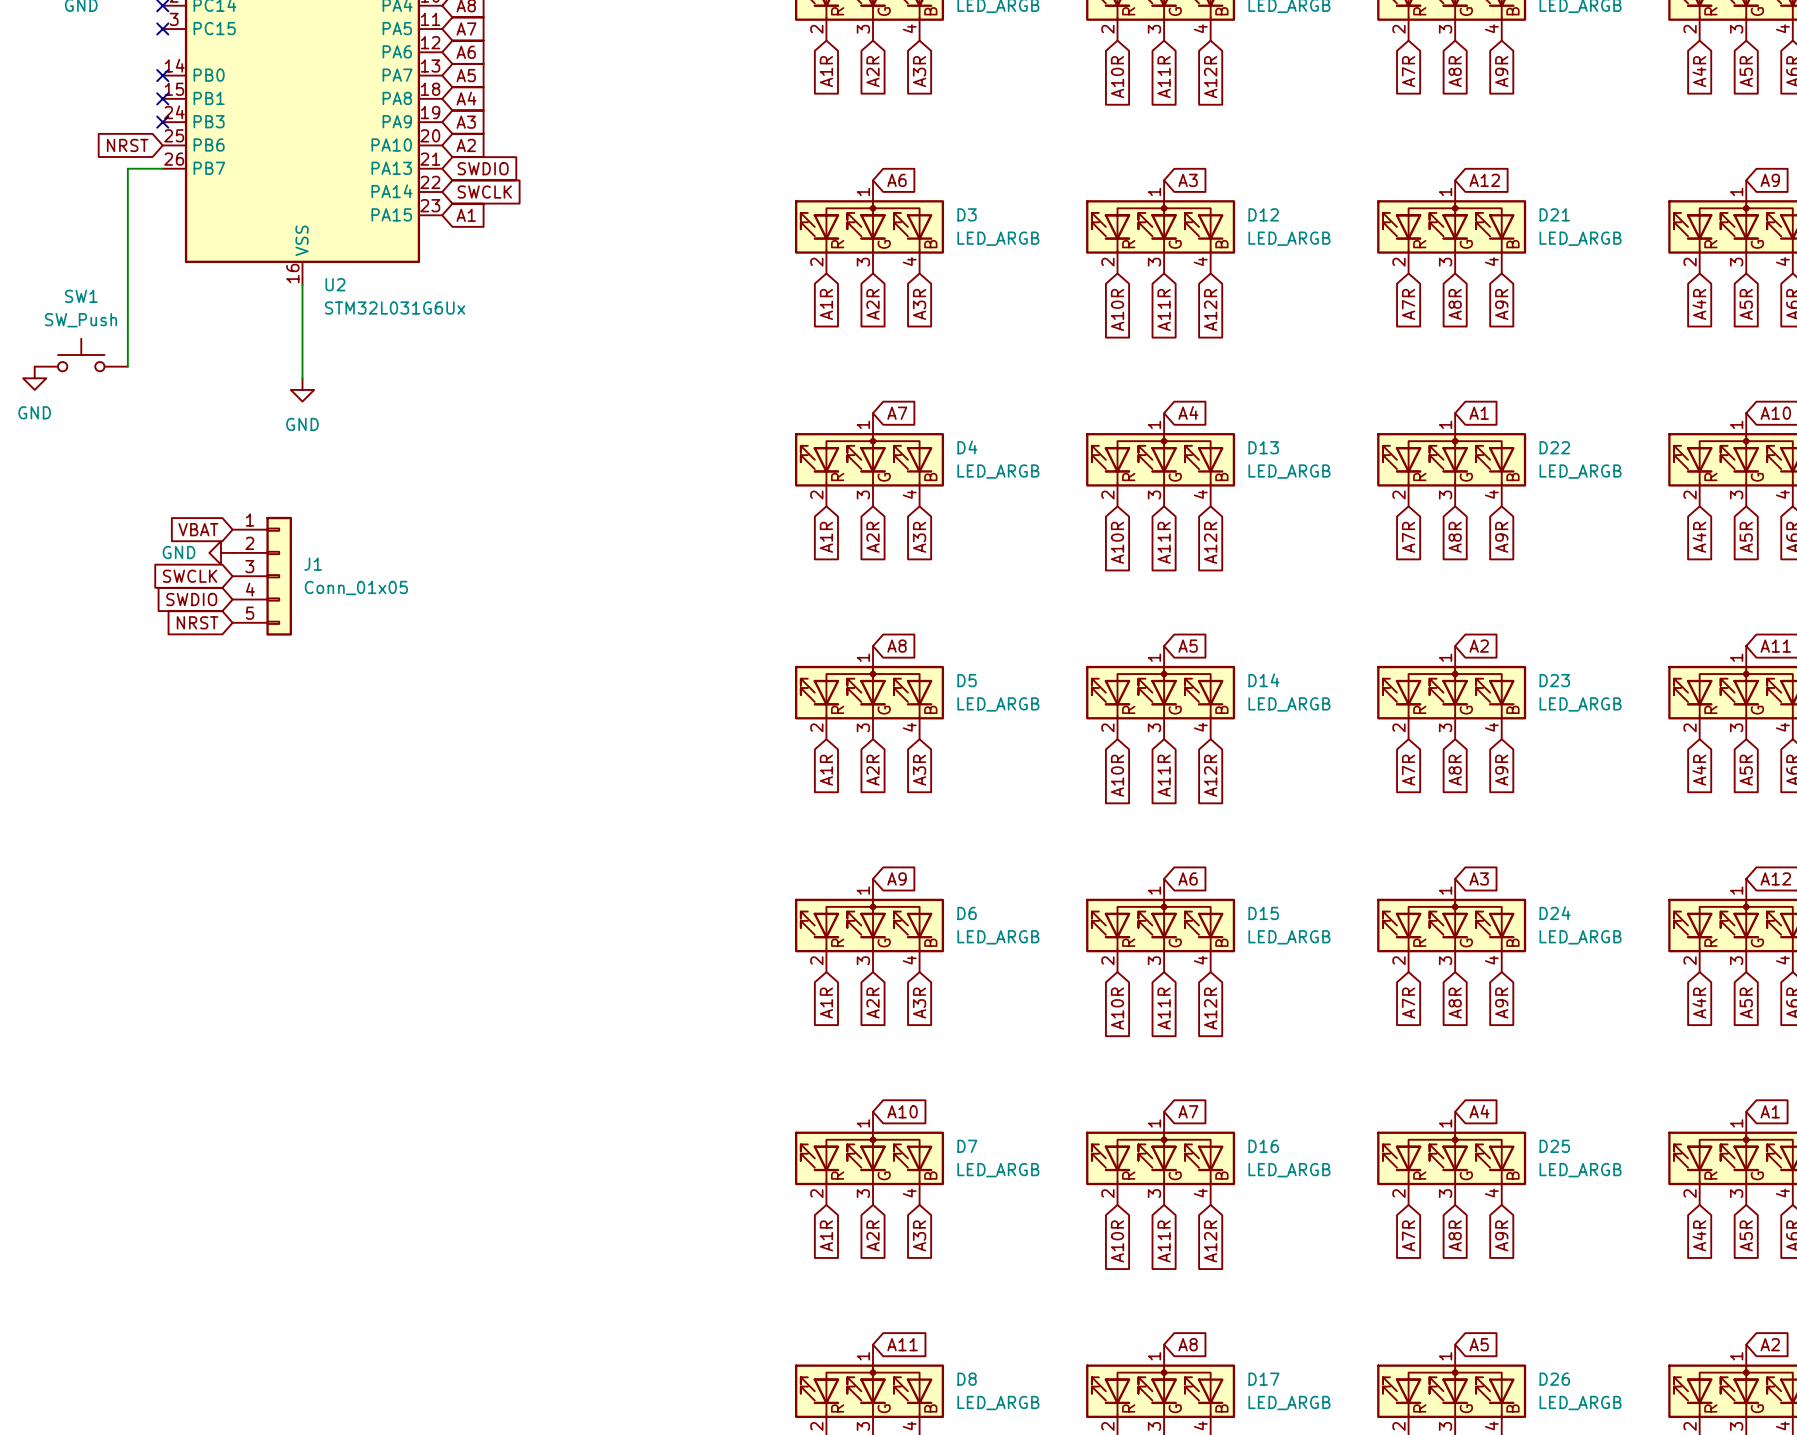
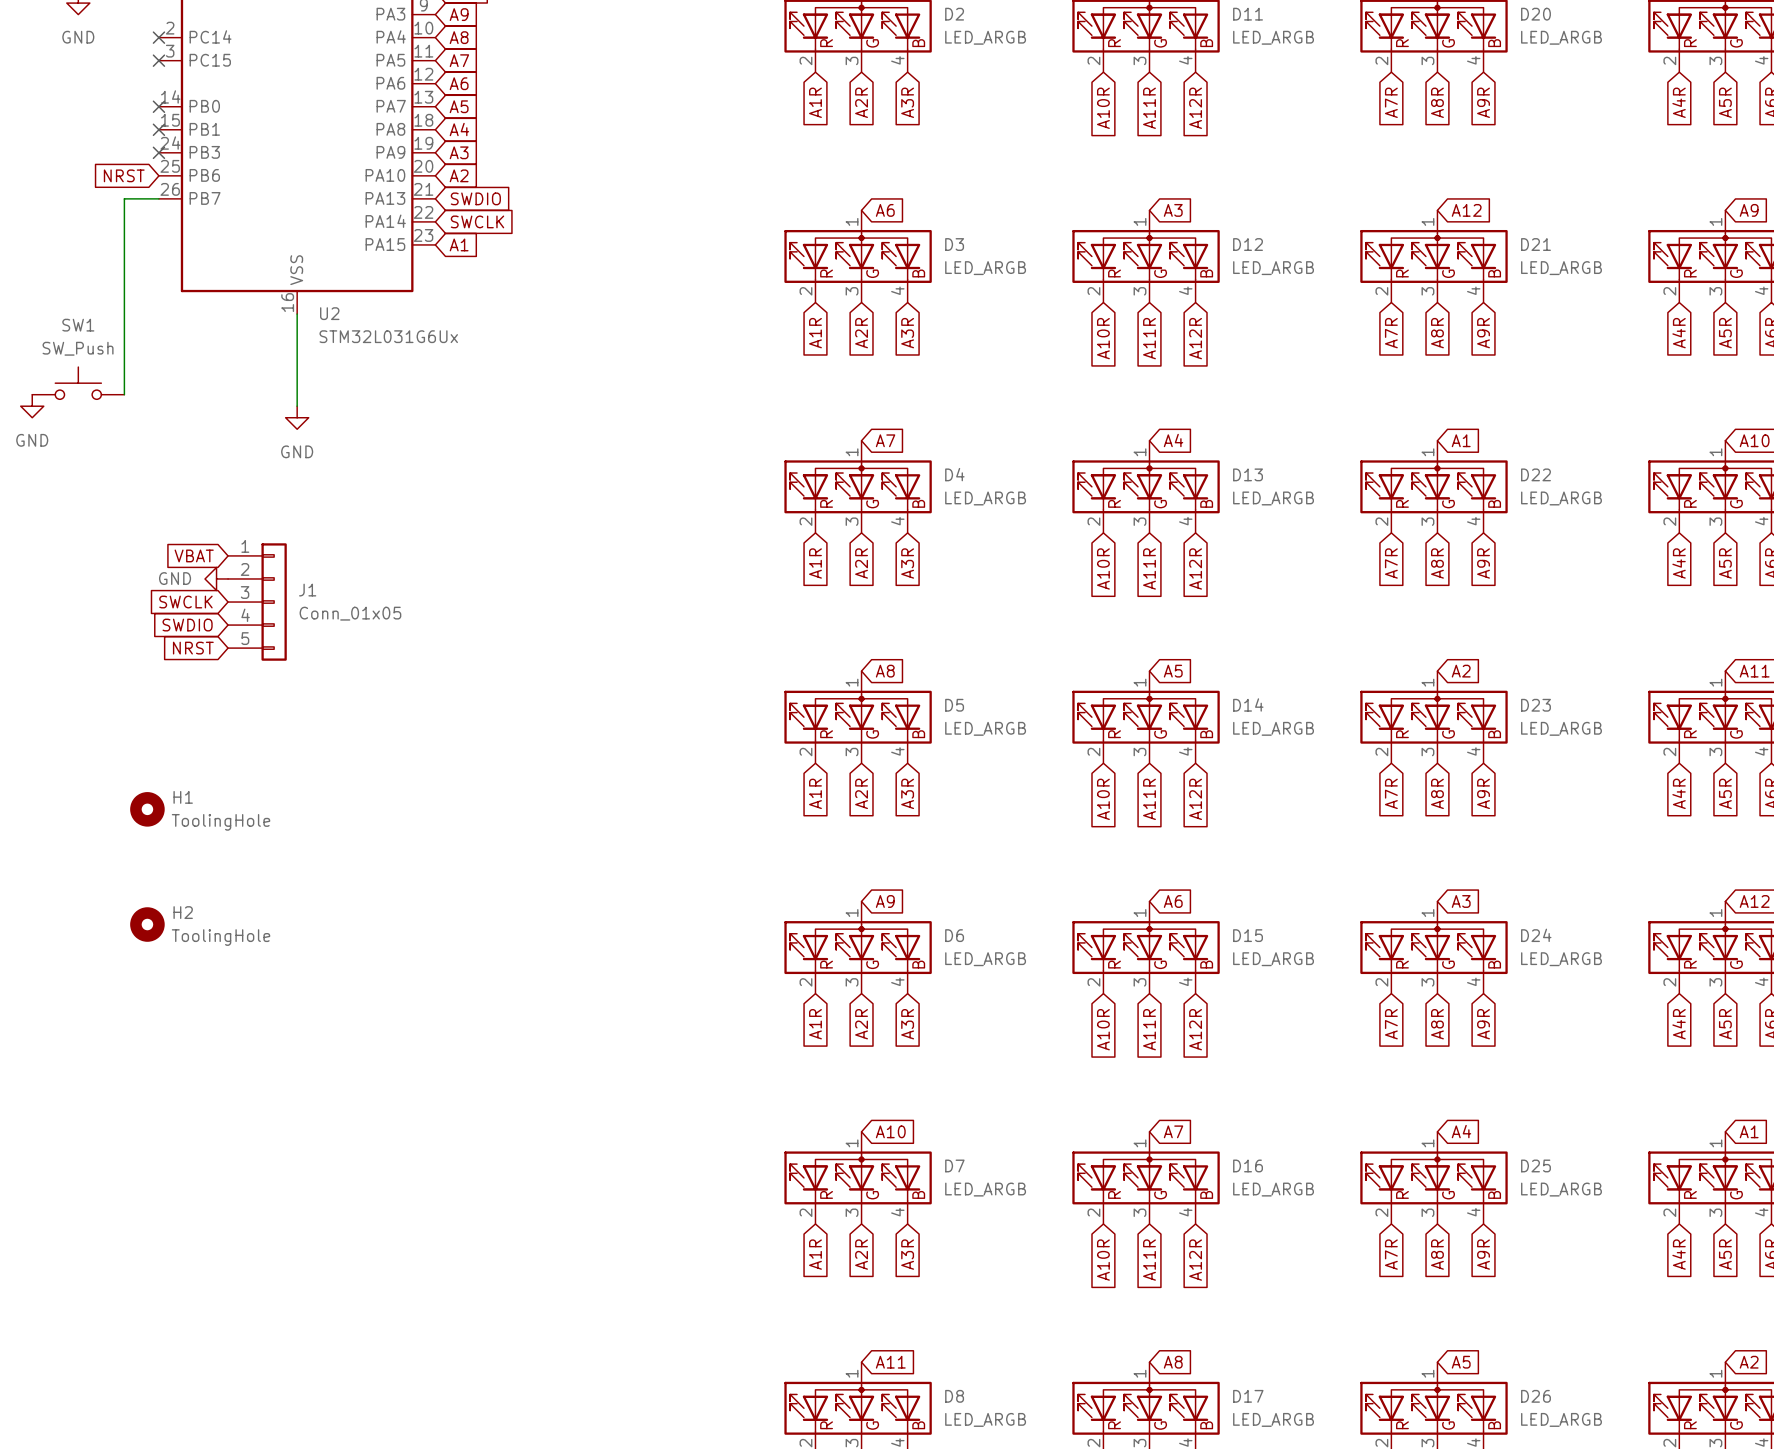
H1: none -> ToolingHole (147, 809)
H2: none -> ToolingHole (147, 924)

